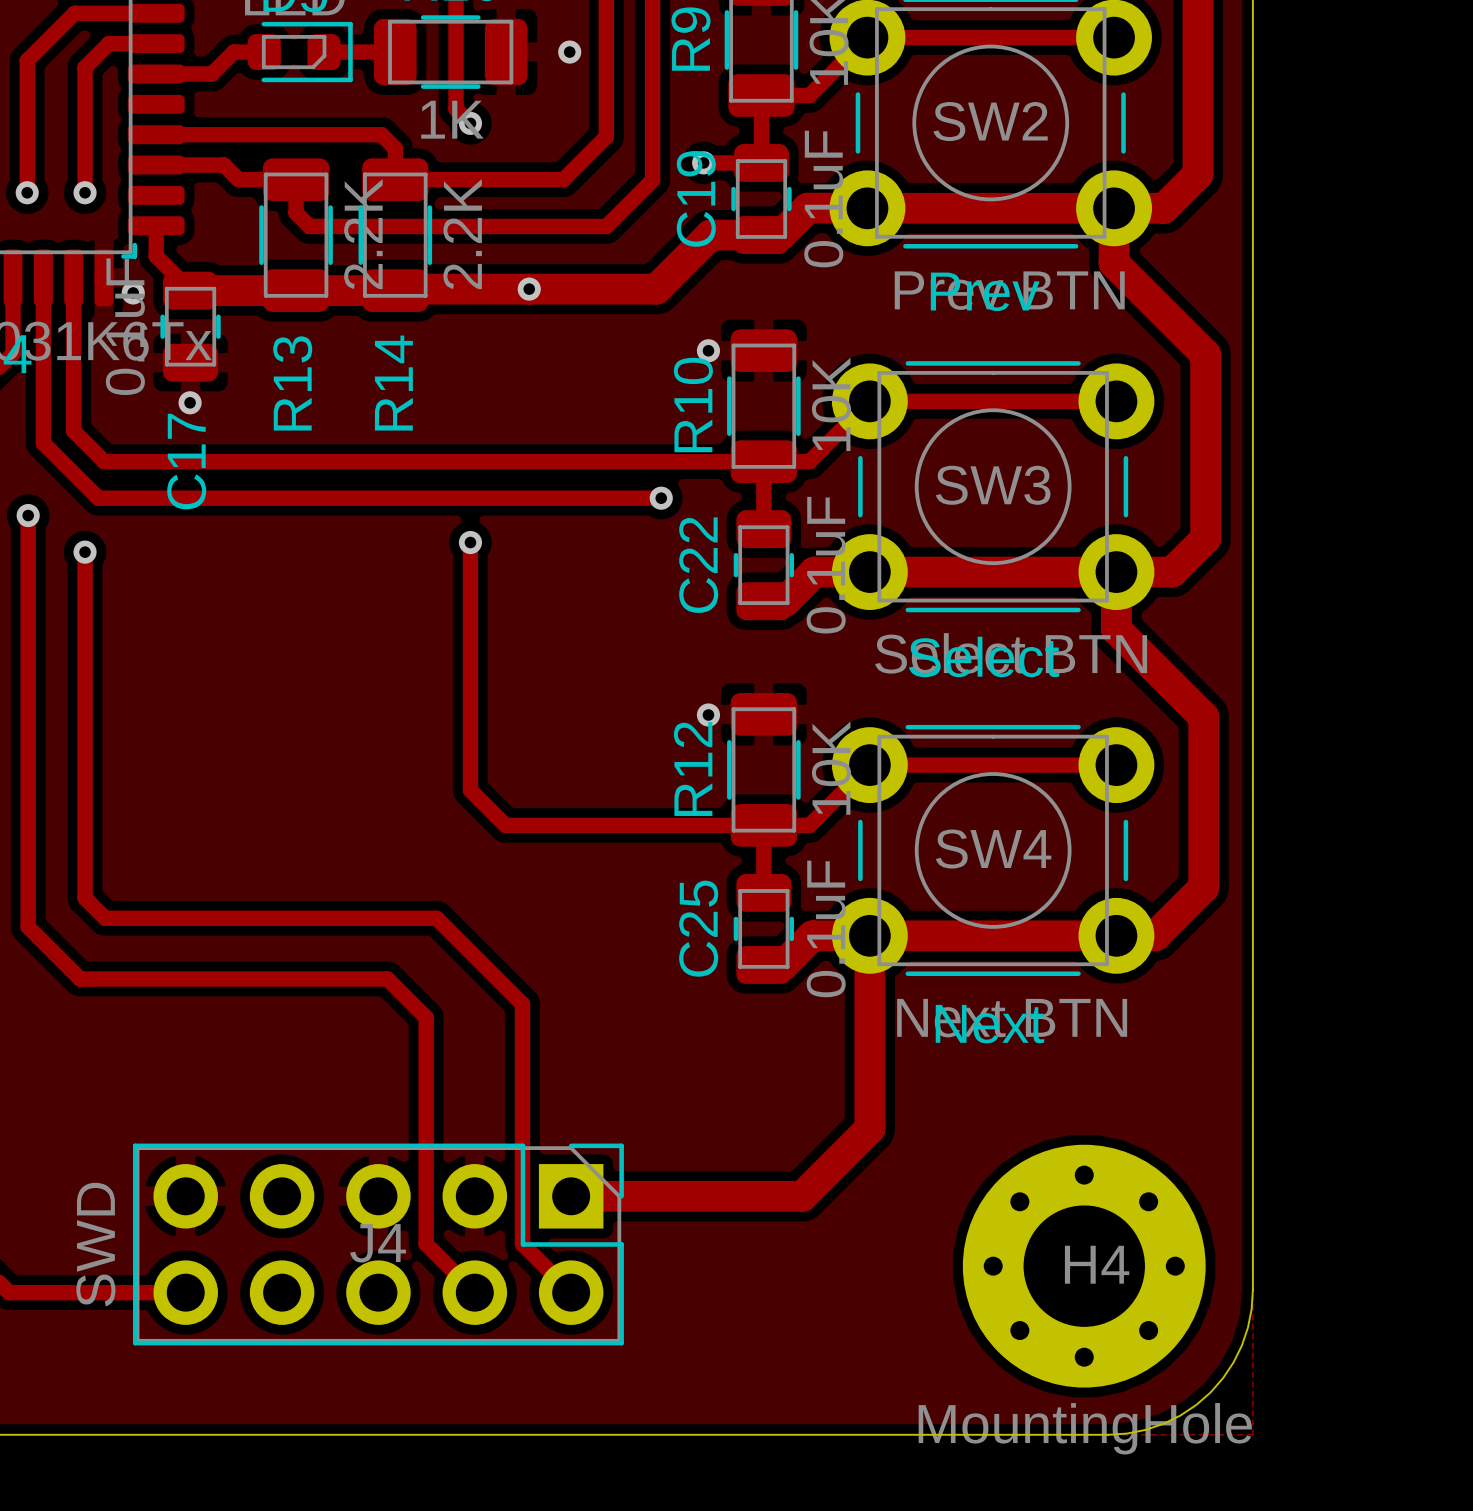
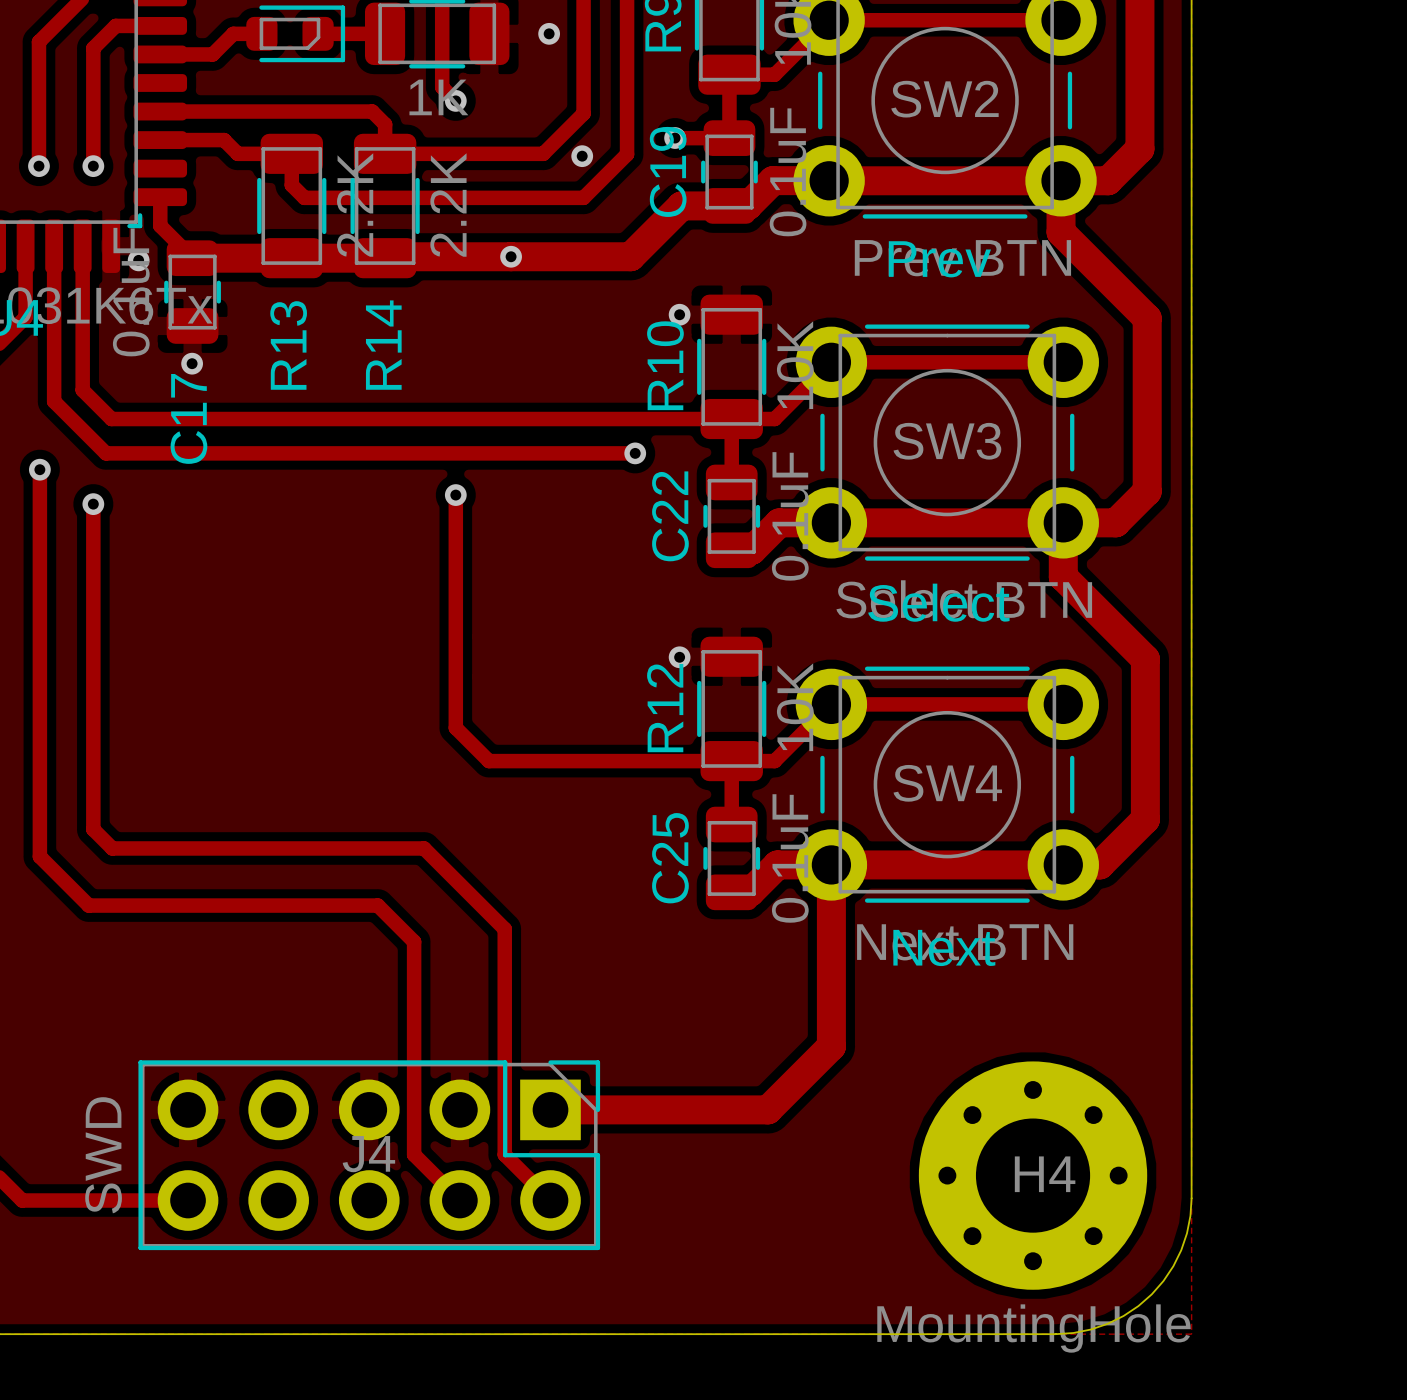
via: none -> (582, 156)

